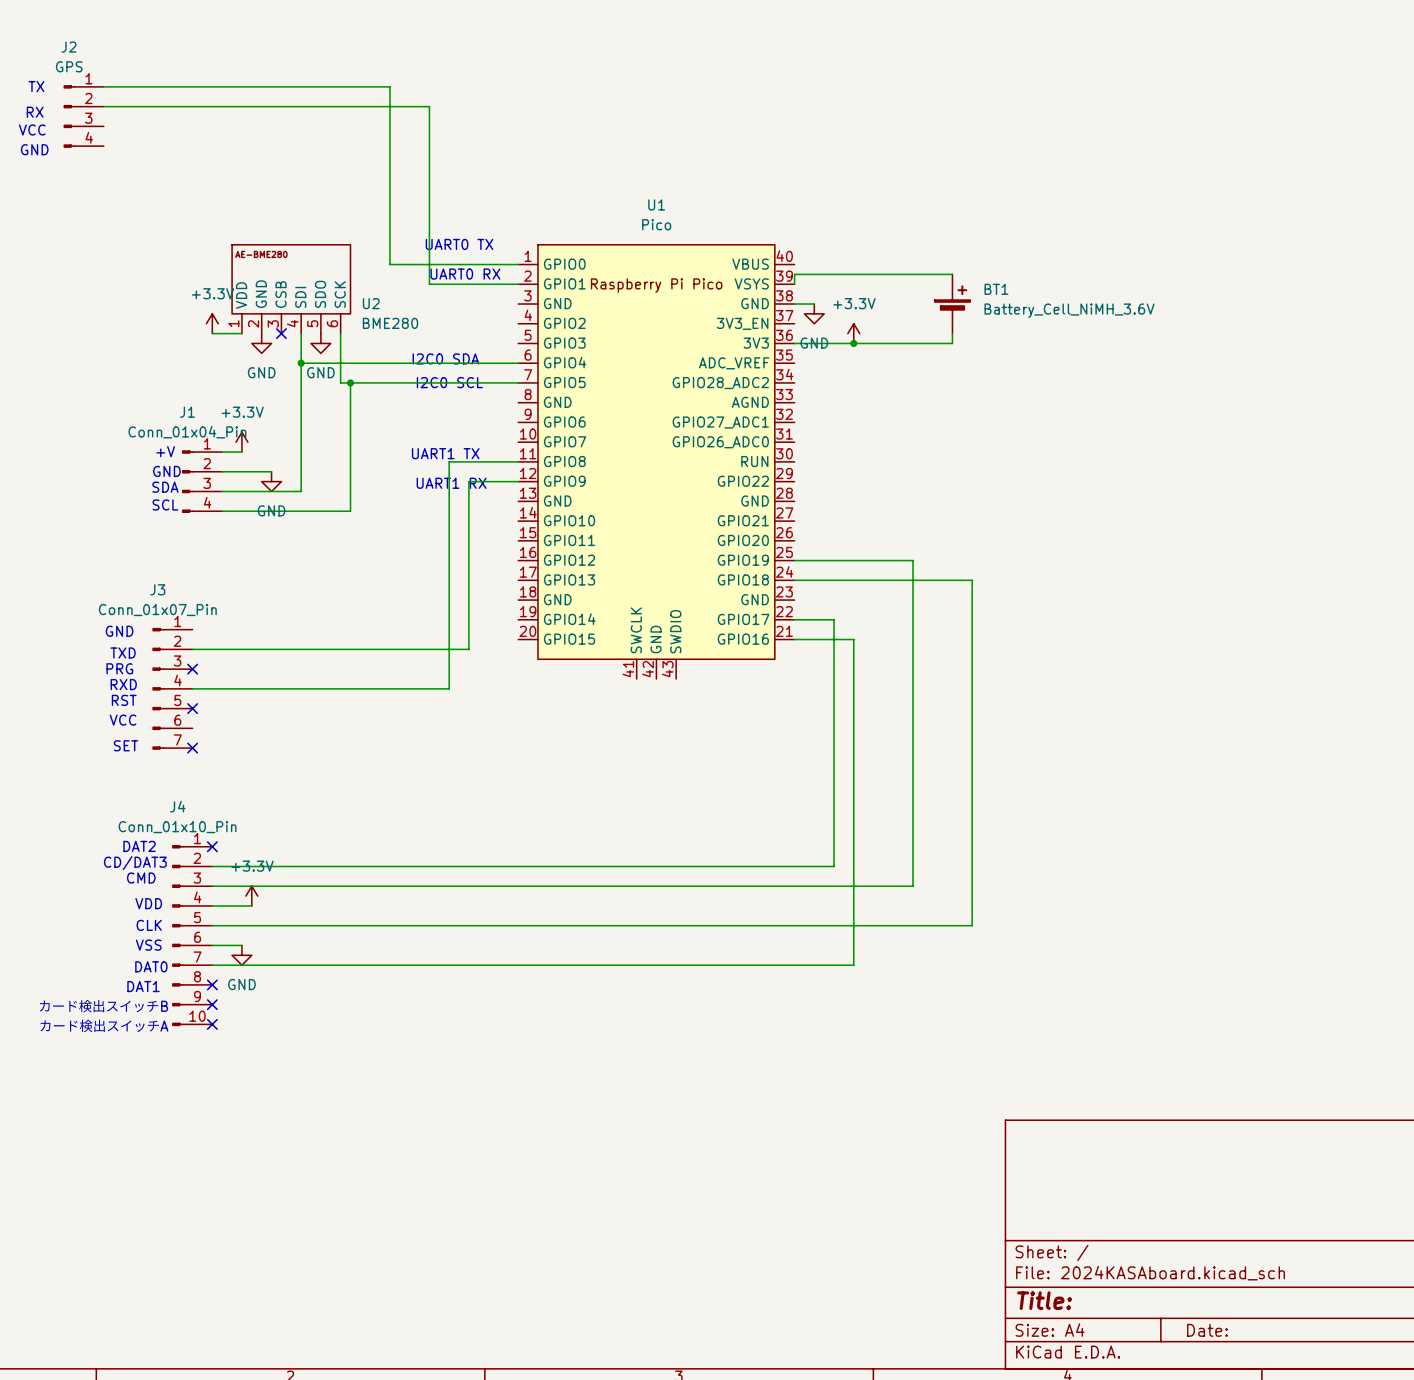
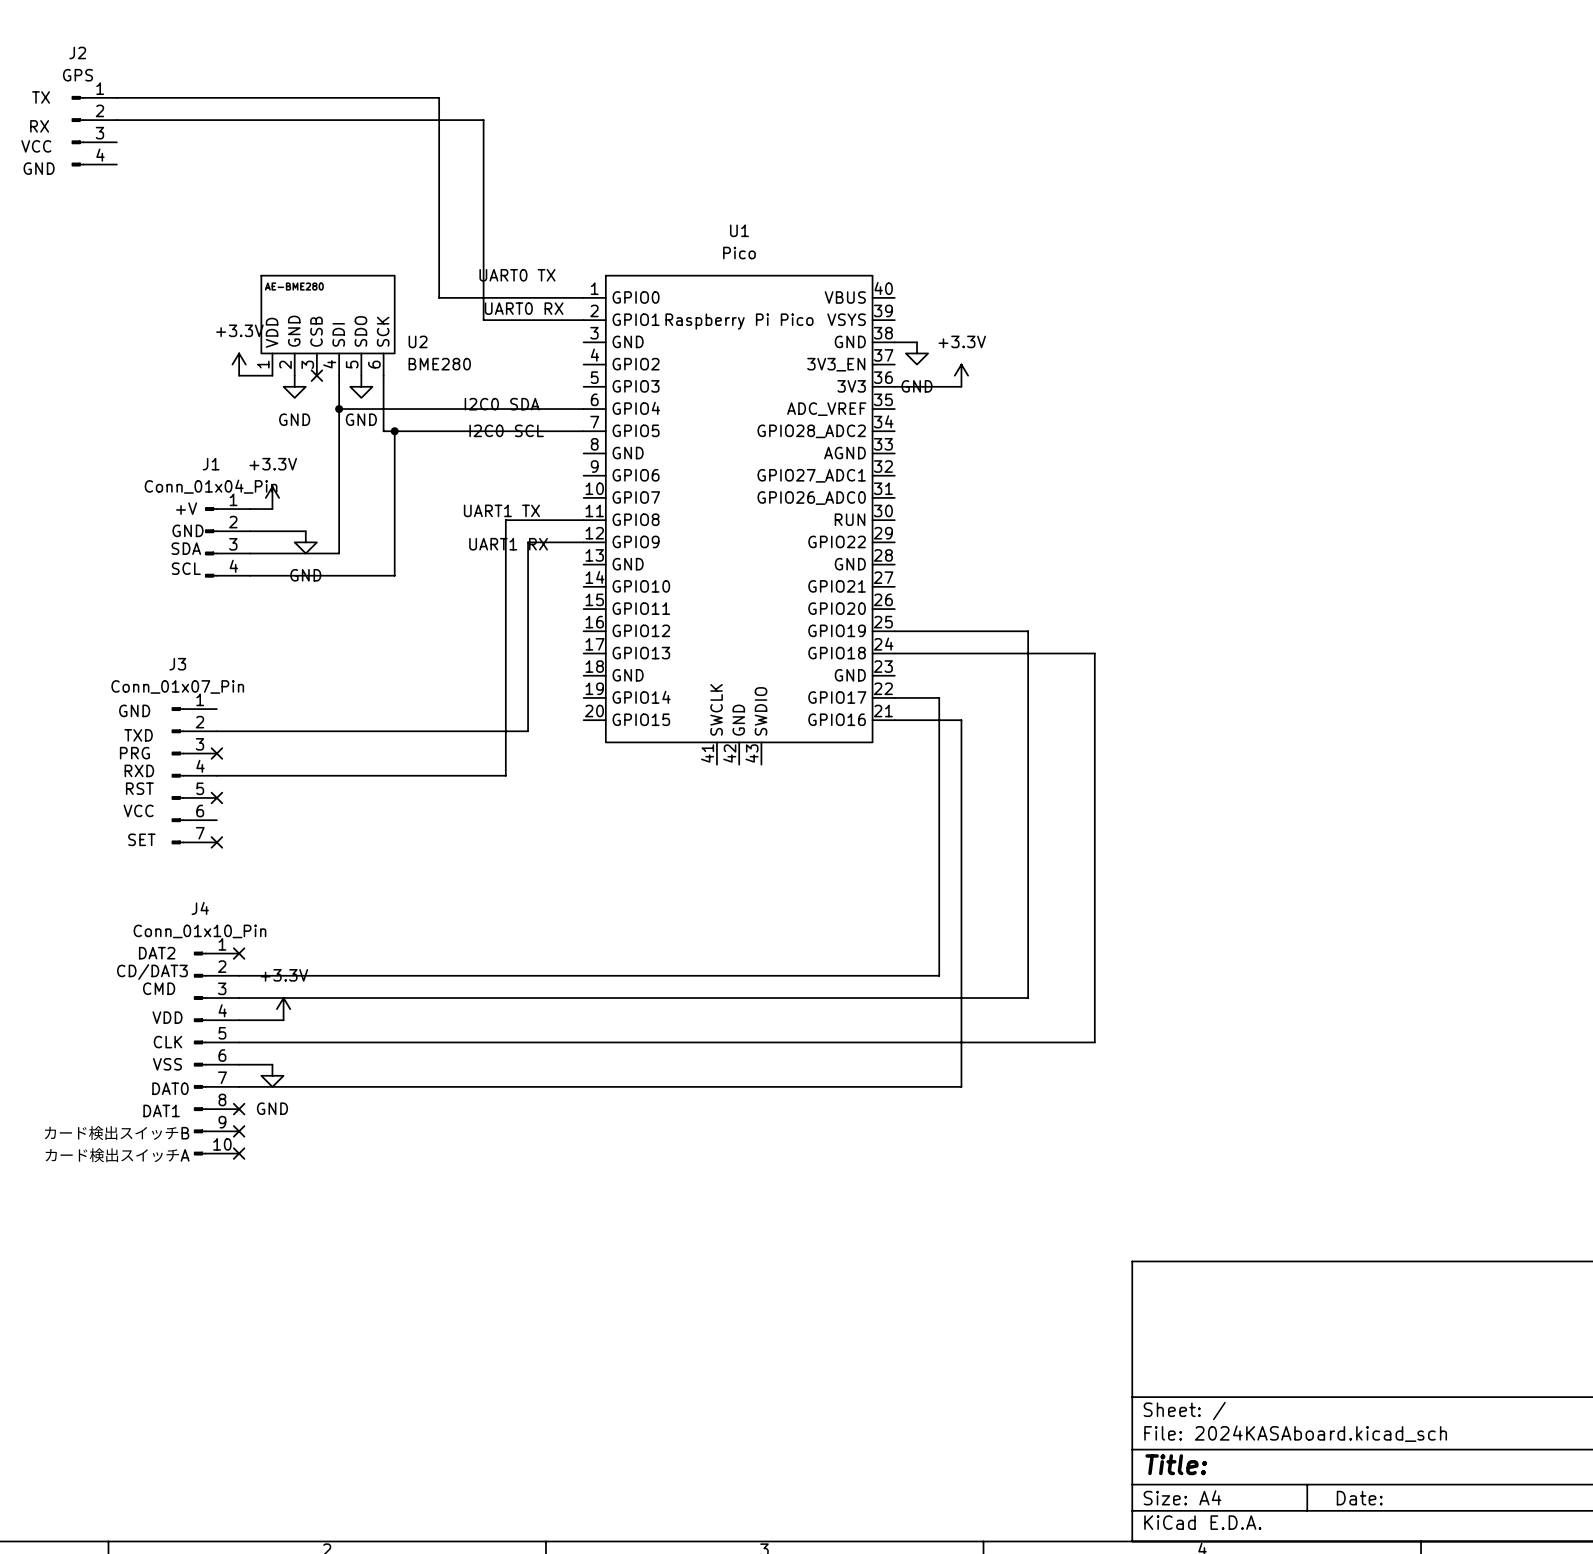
wire: (952, 274) (794, 274) (794, 284) -> none
BT1: Battery_Cell_NiMH_3.6V (952, 304) -> none
wire: (952, 333) (952, 343) (853, 343) -> none
junction: (853, 343) -> none

